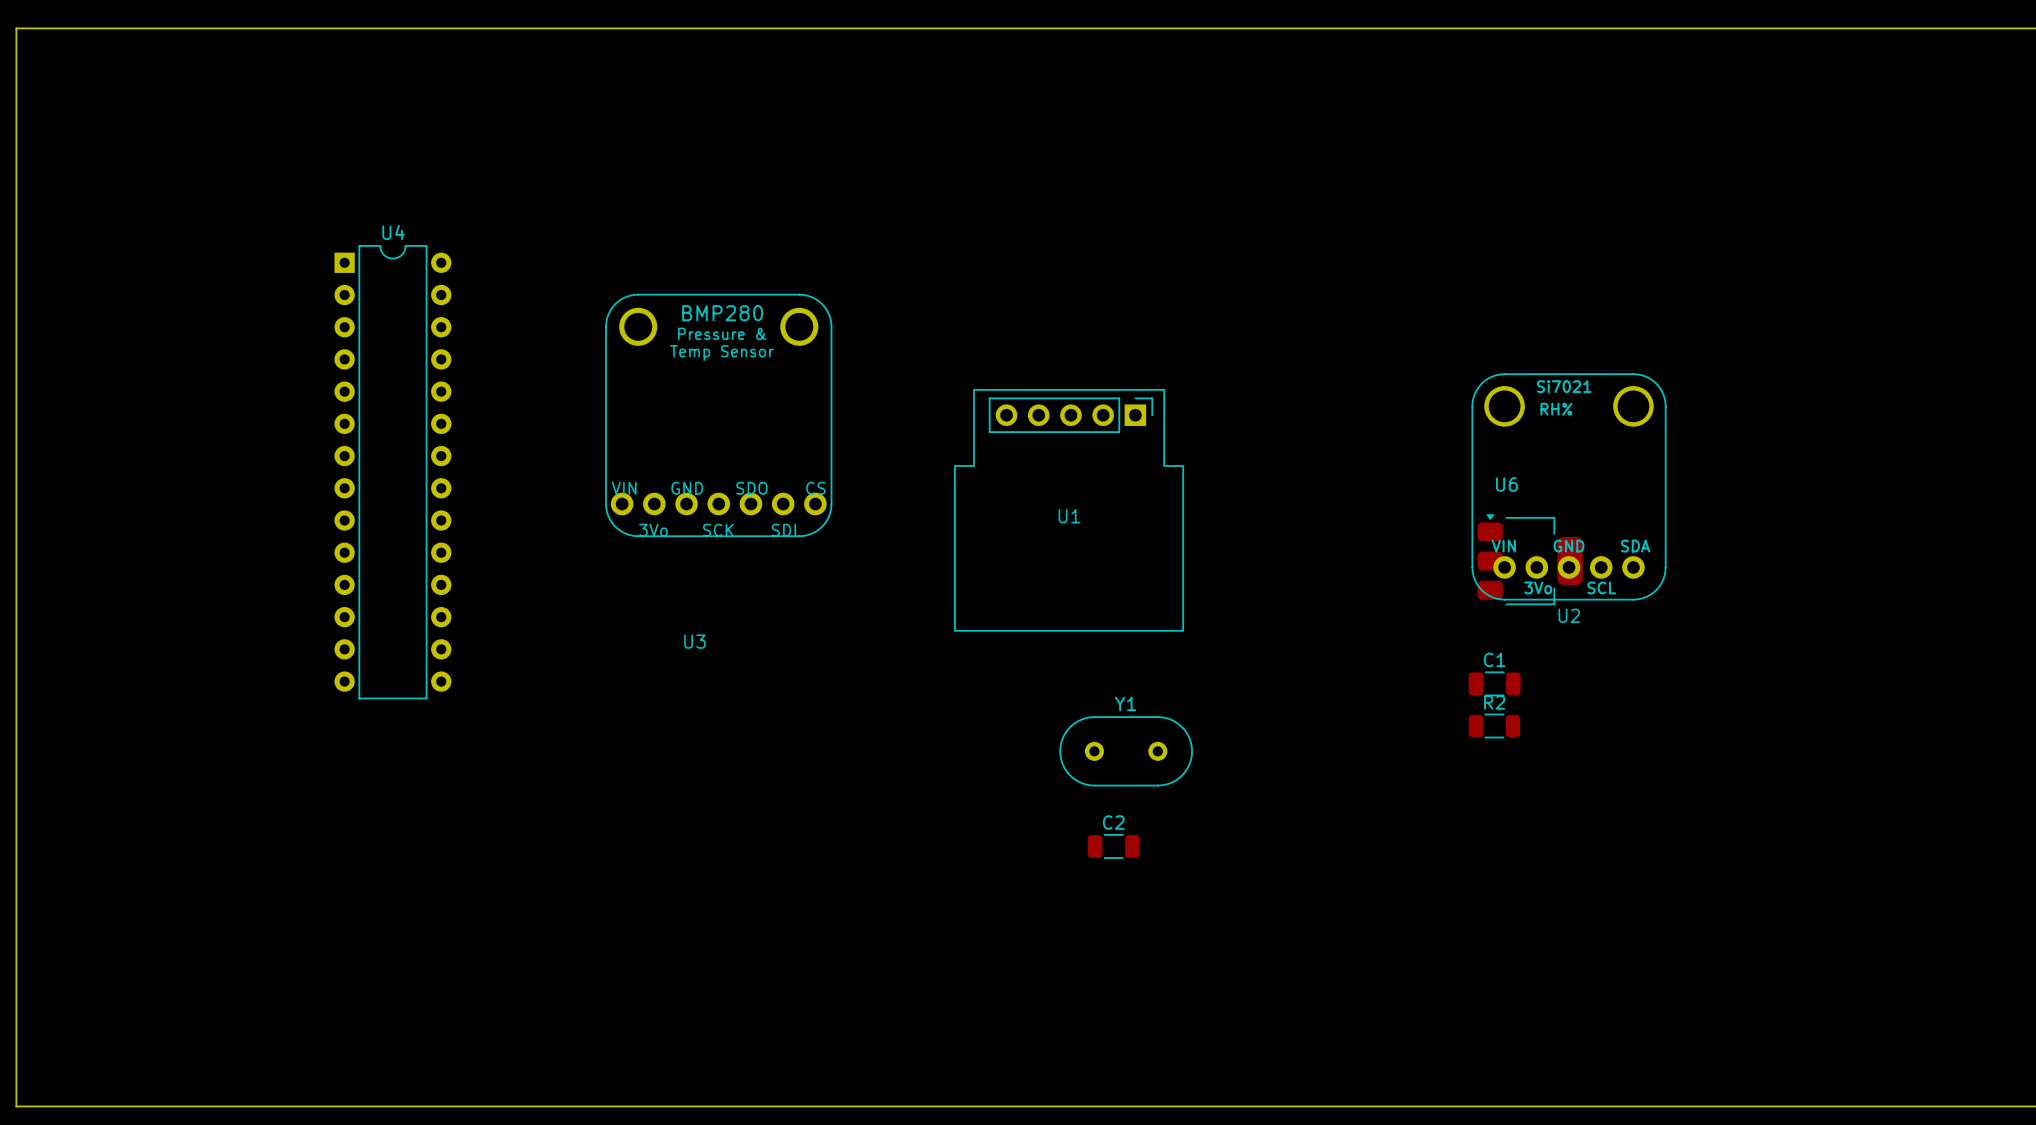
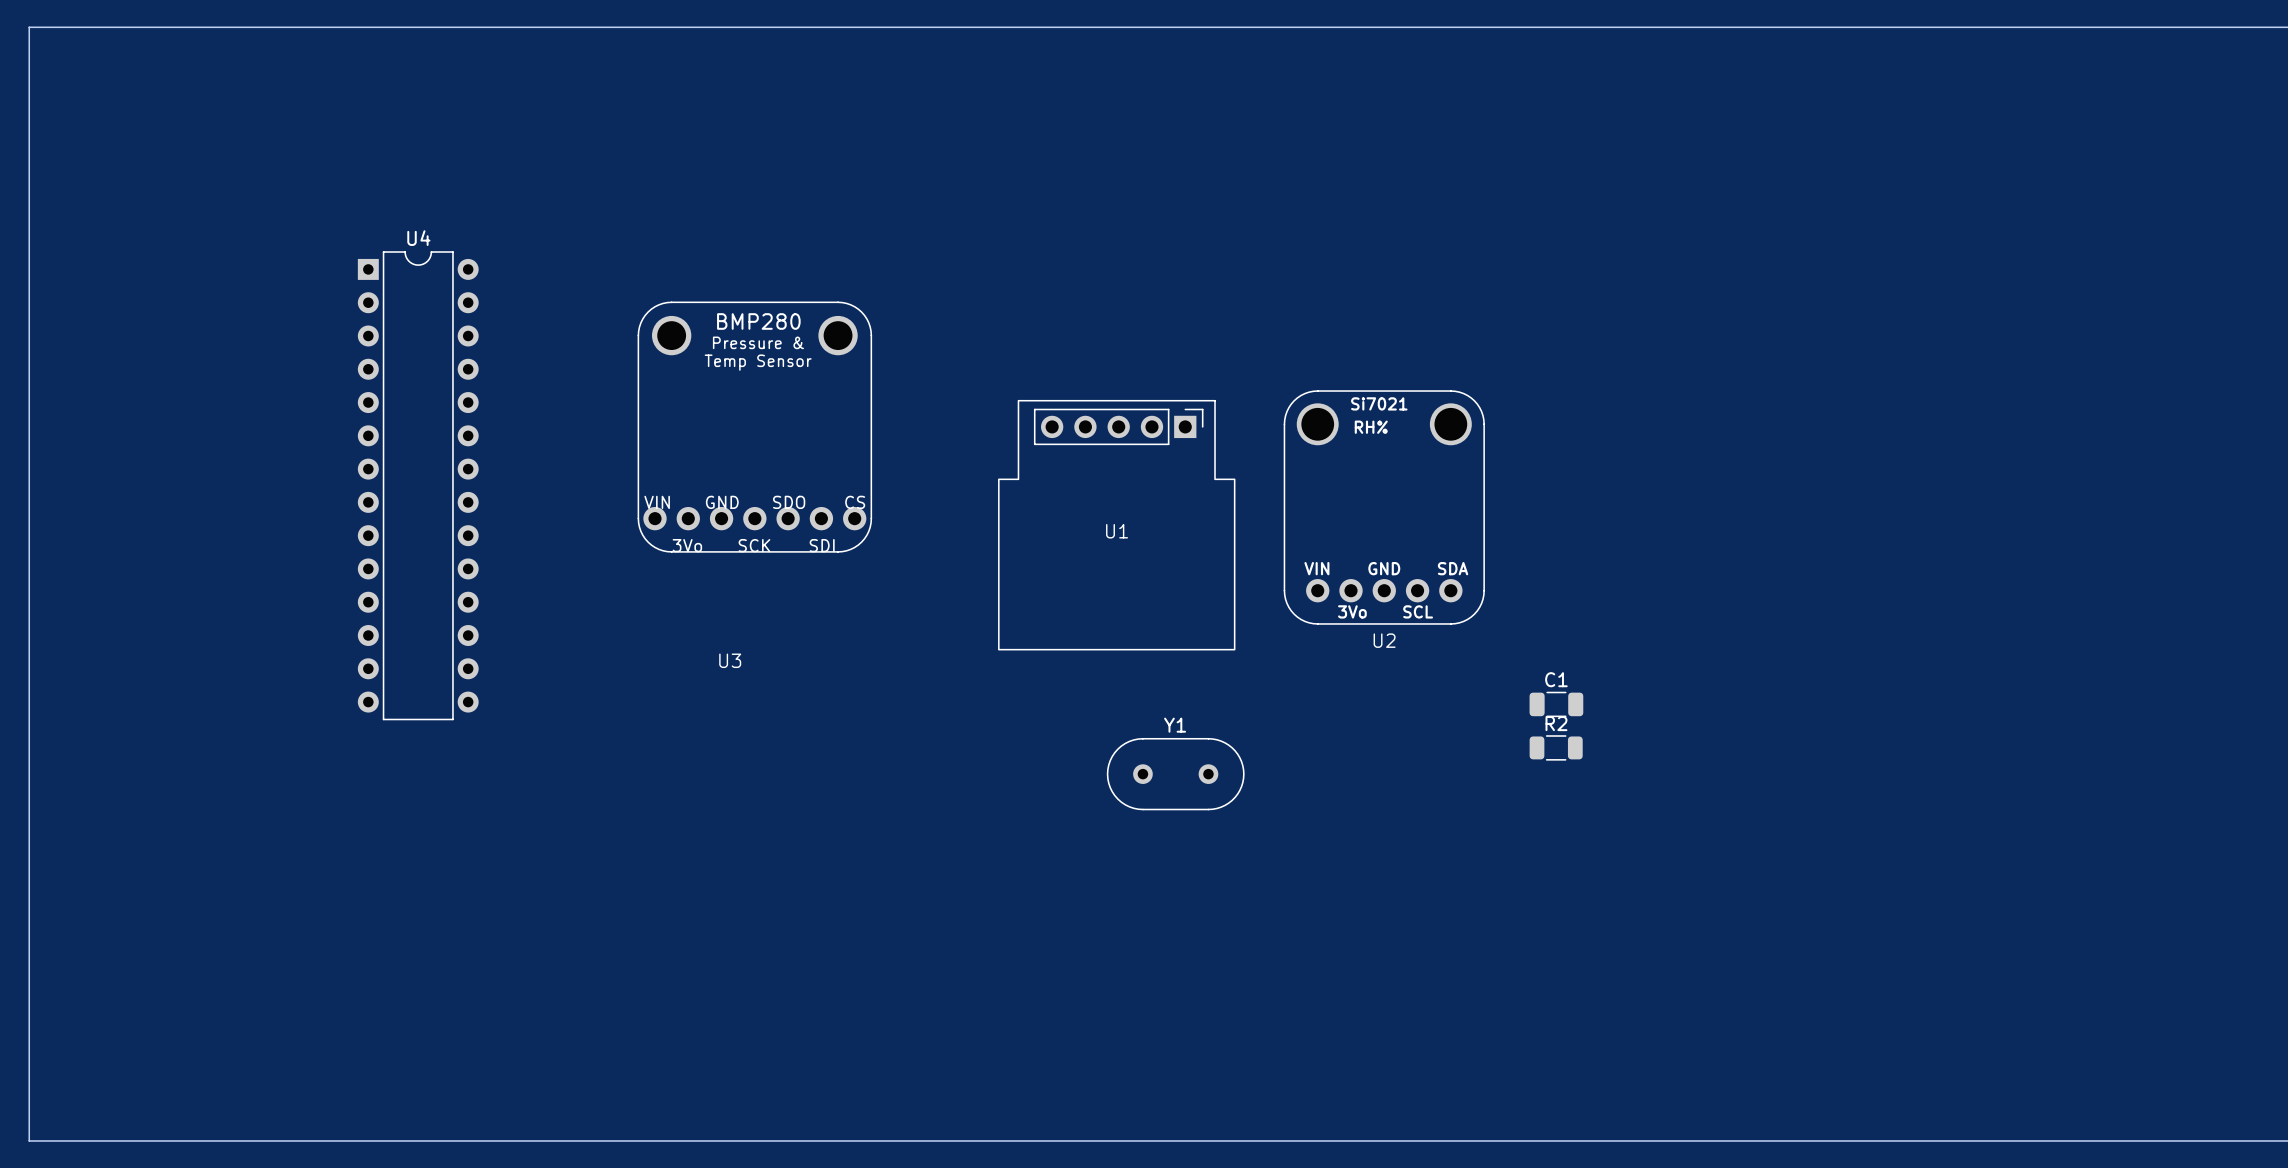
U2 position: (1569, 486) -> (1384, 507)
U6: (1530, 559) -> none
C2: (1113, 846) -> none

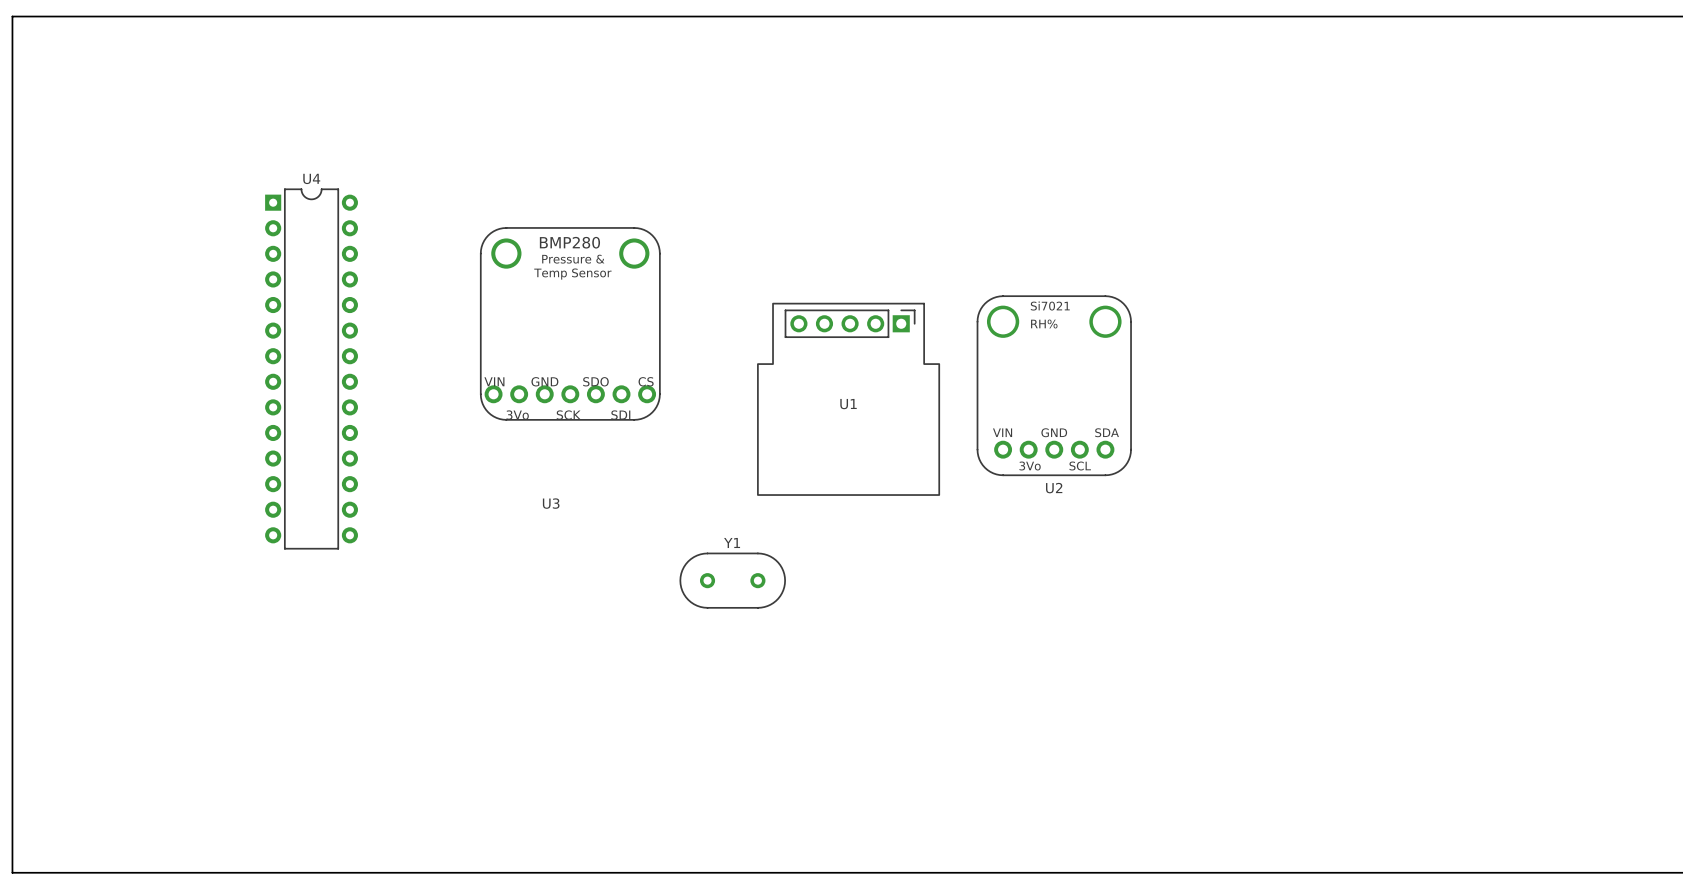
C1: (1556, 704) -> none
R2: (1556, 747) -> none
Y1 position: (1175, 774) -> (732, 580)

